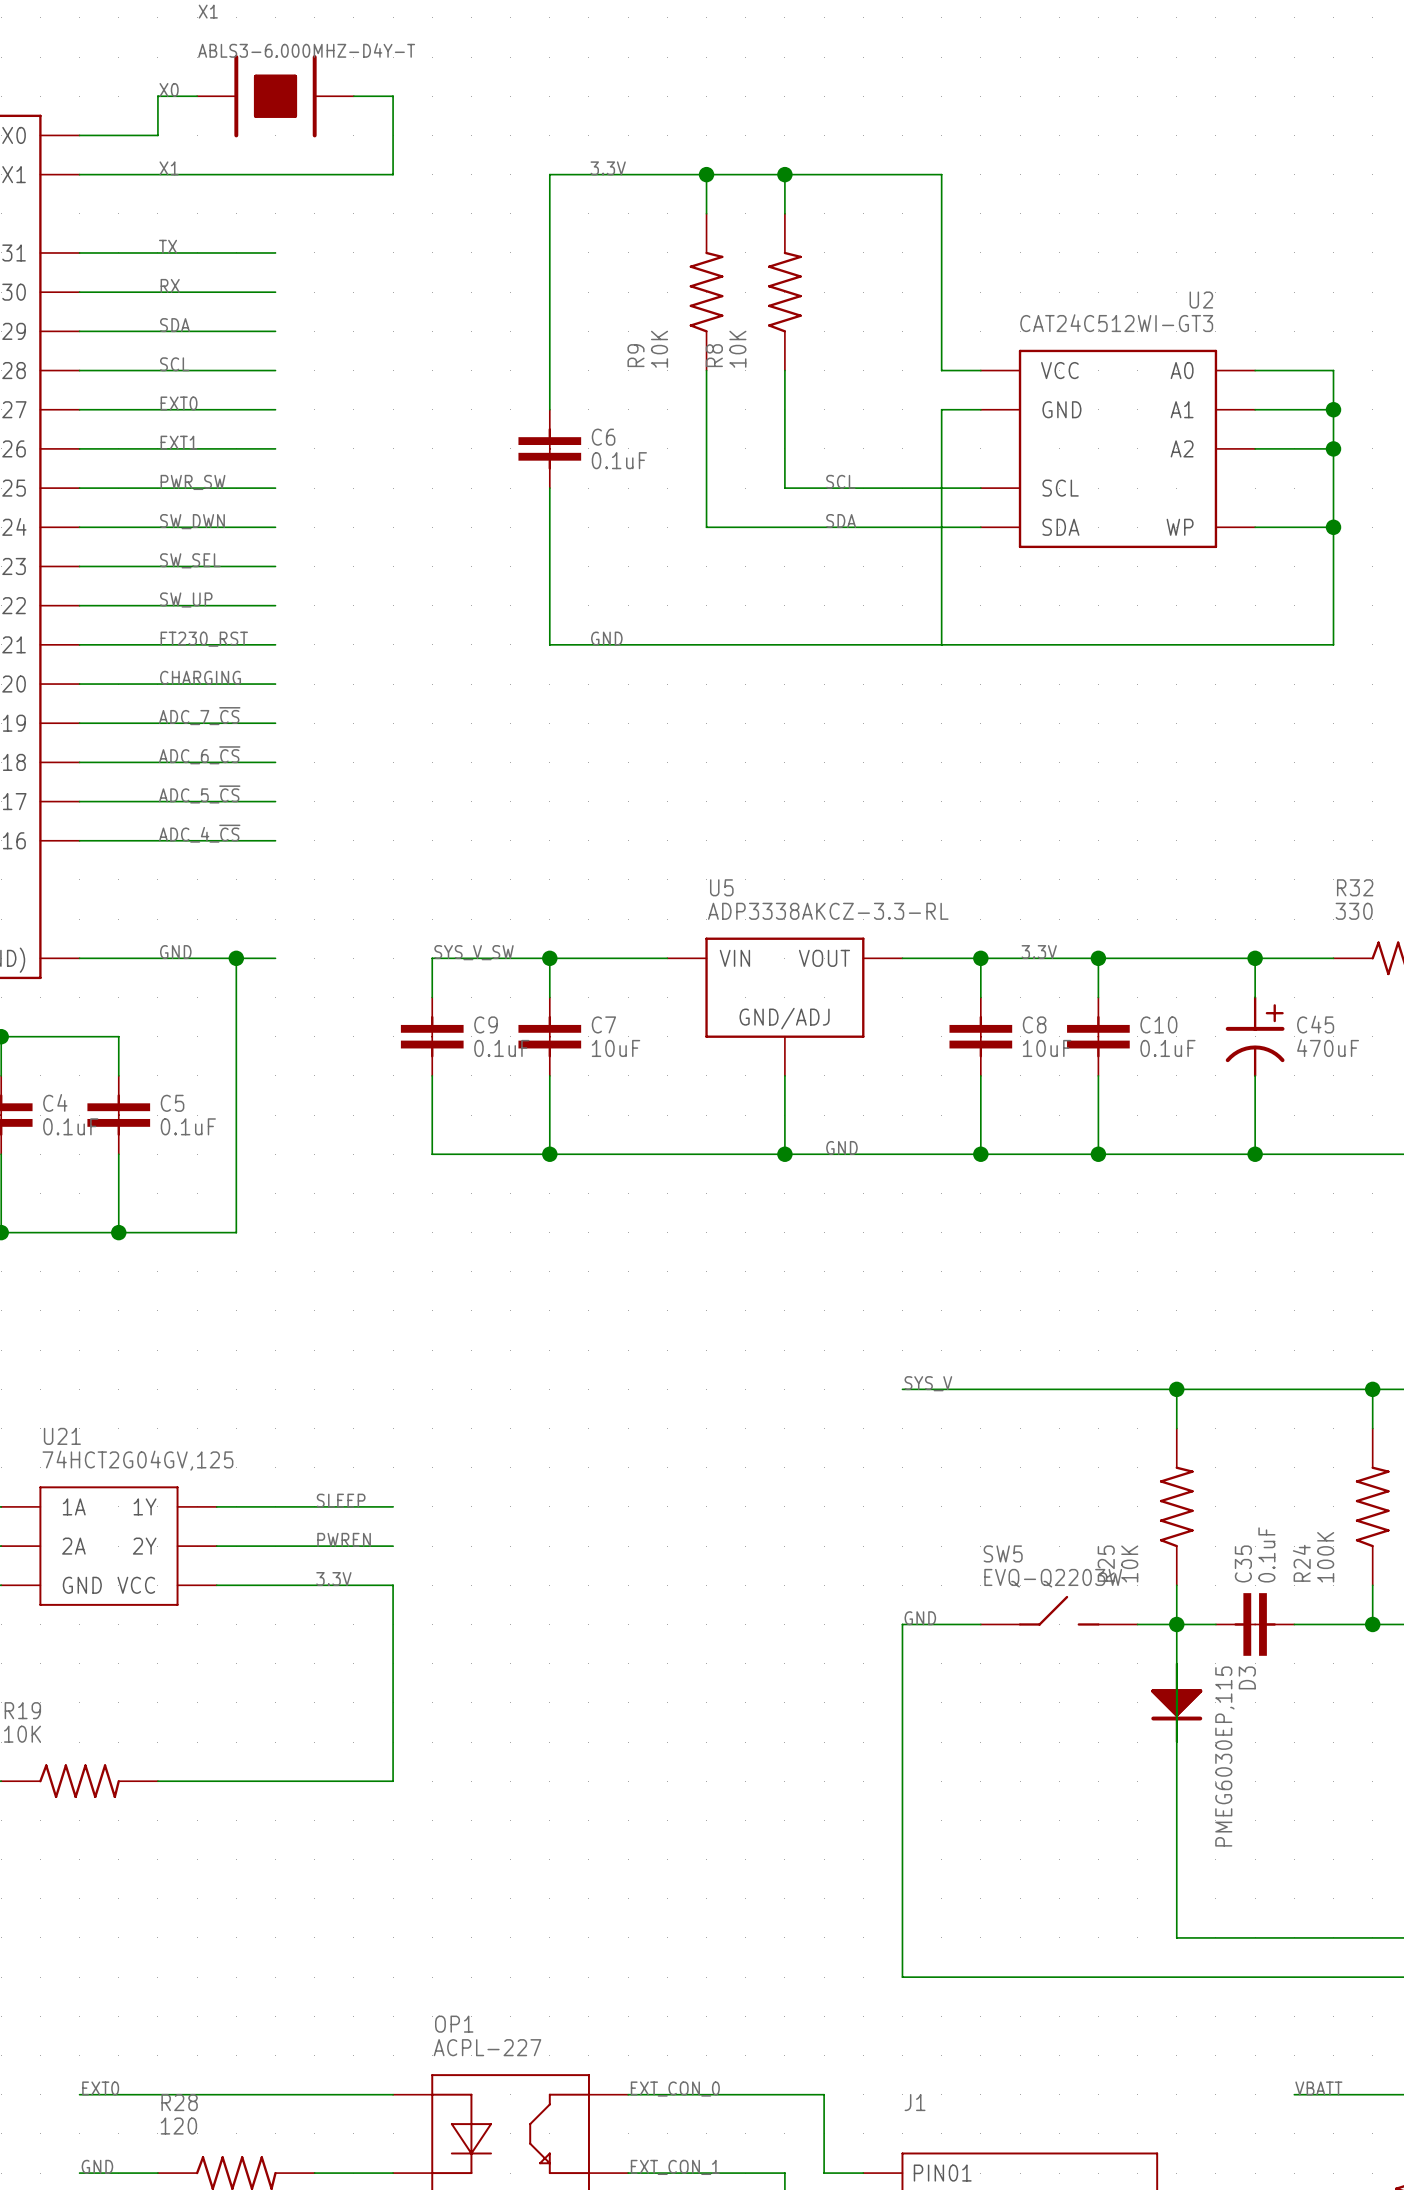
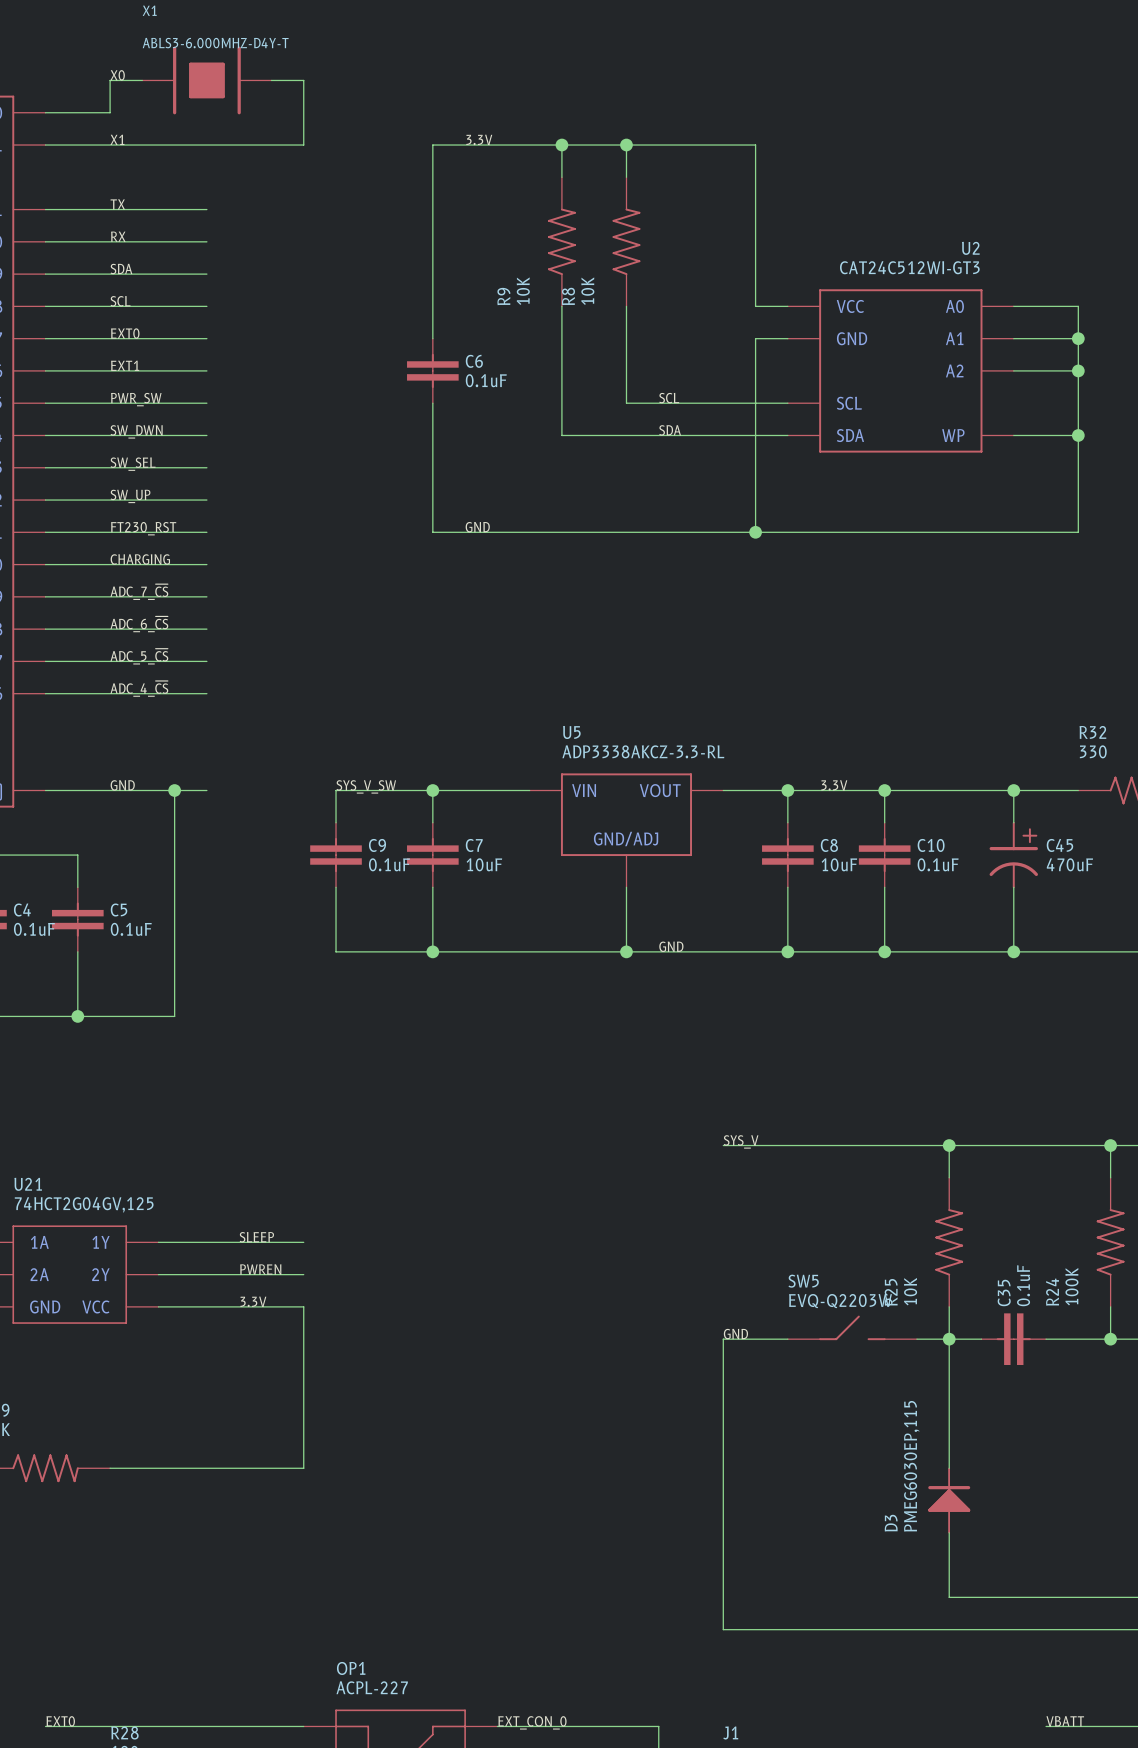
junction: none -> (755, 532)
D3 position: (1176, 1702) -> (949, 1500)
D3 rotation: 0° (1176, 1704) -> 180° (949, 1498)

